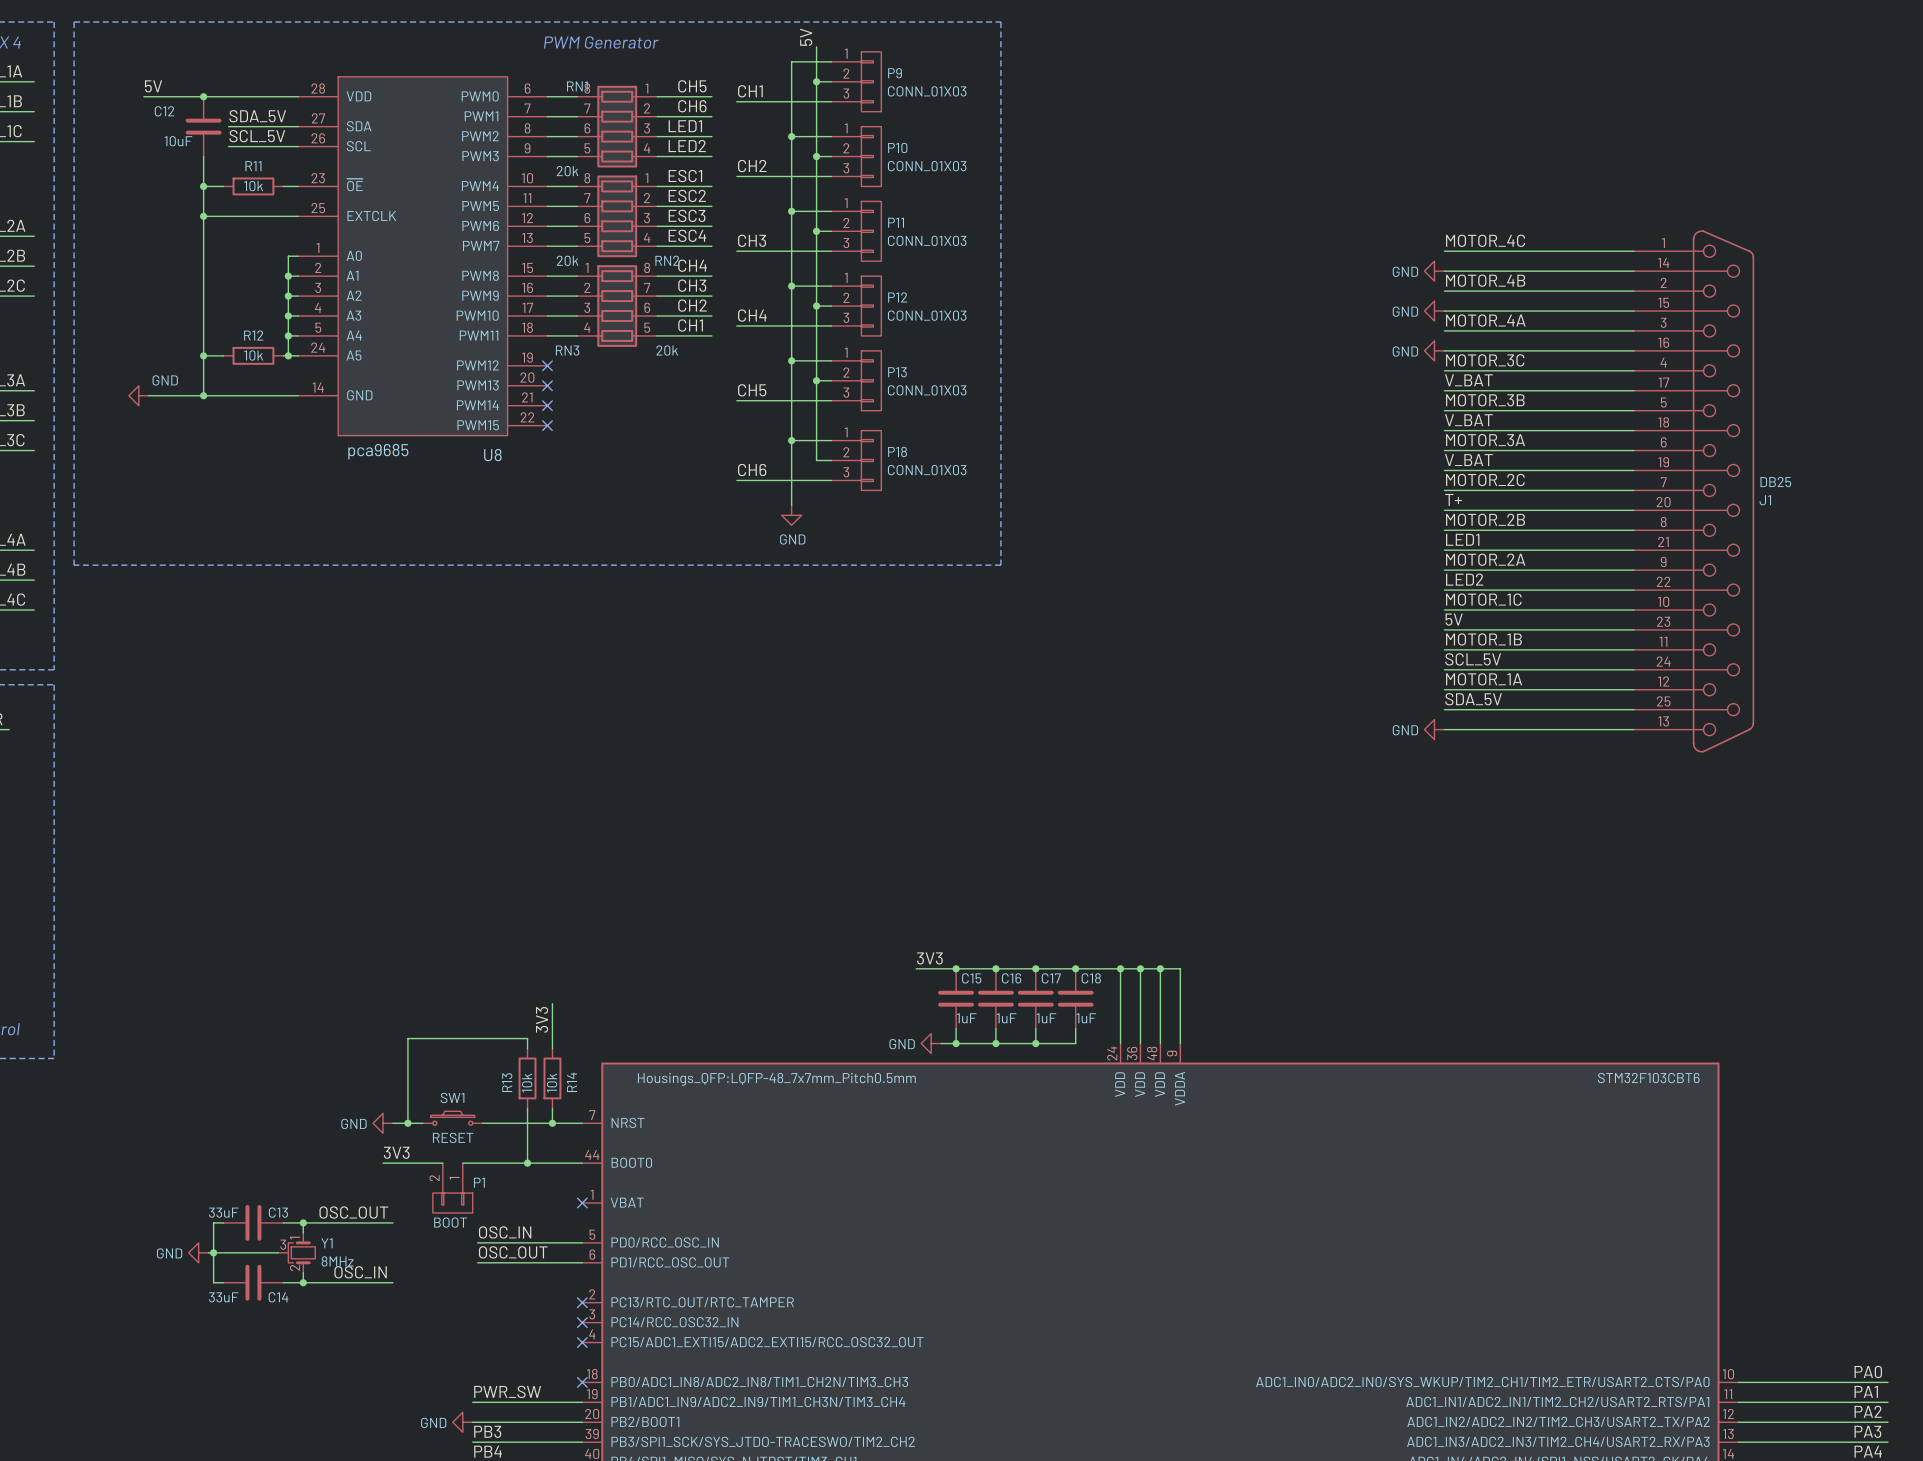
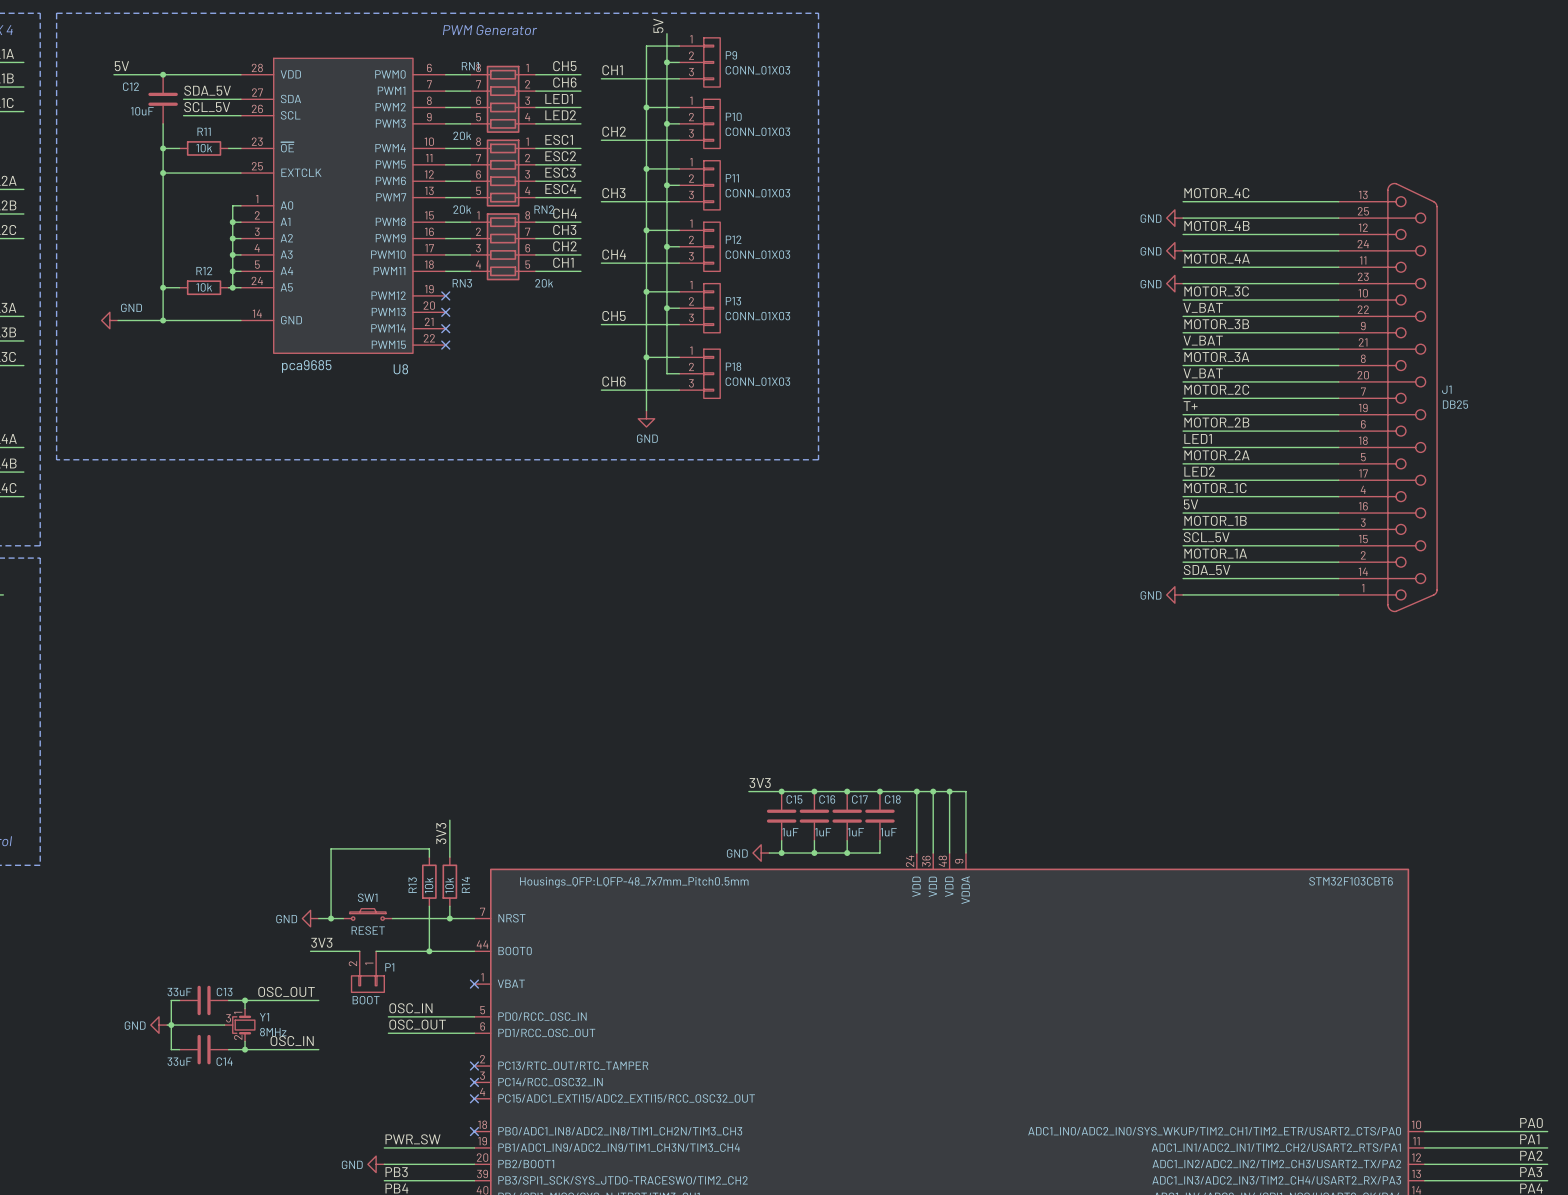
J1 flip: as is (1723, 491) -> up-down (1412, 397)

